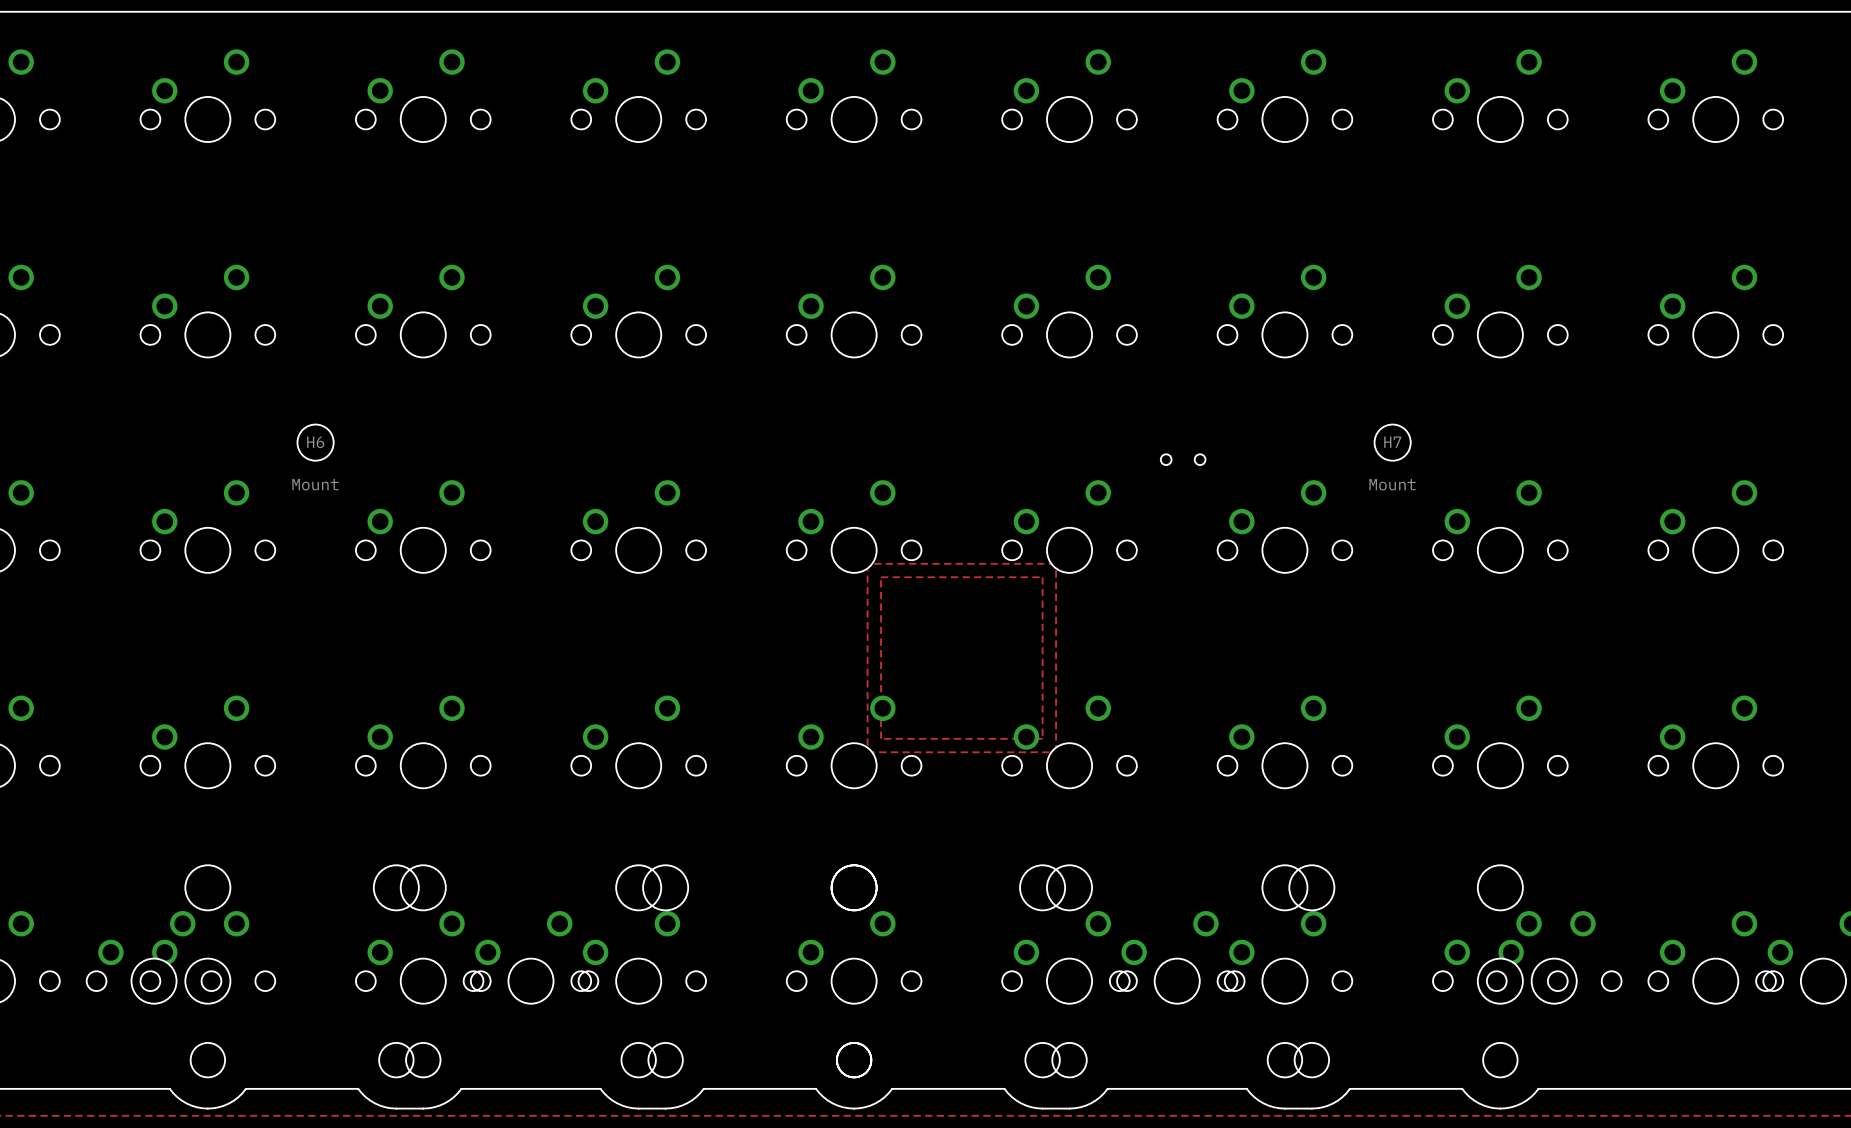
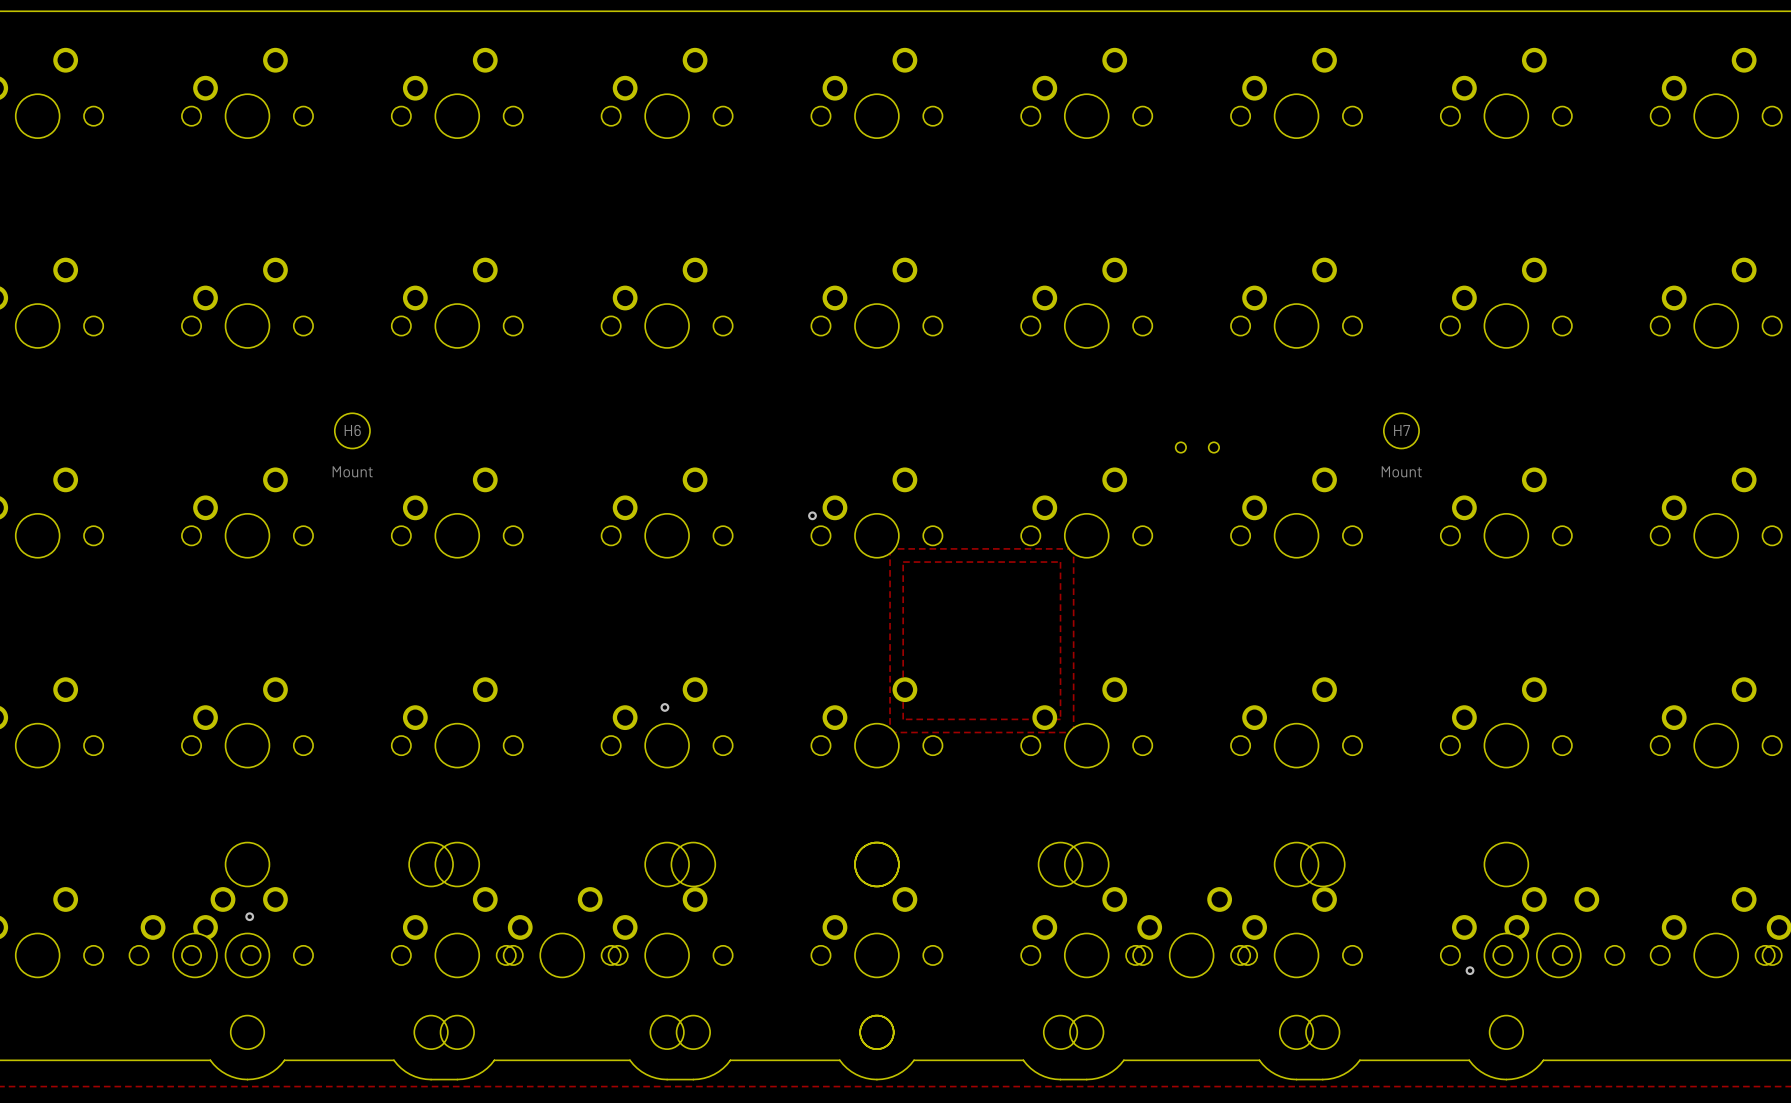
via: none -> (812, 515)
via: none -> (664, 707)
via: none -> (249, 916)
via: none -> (1470, 970)

